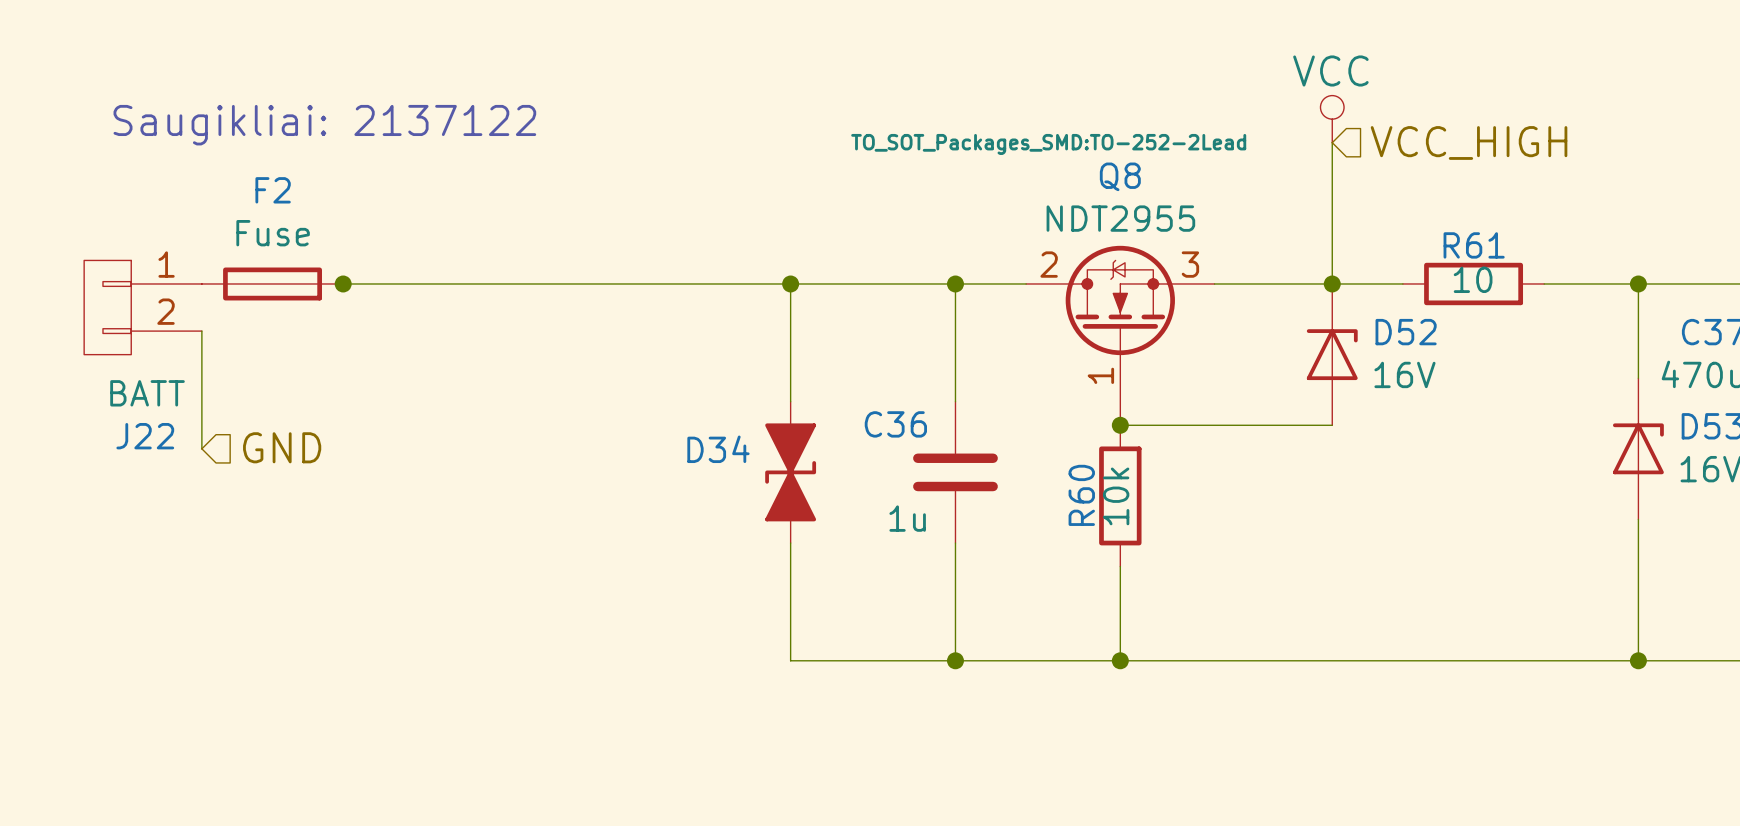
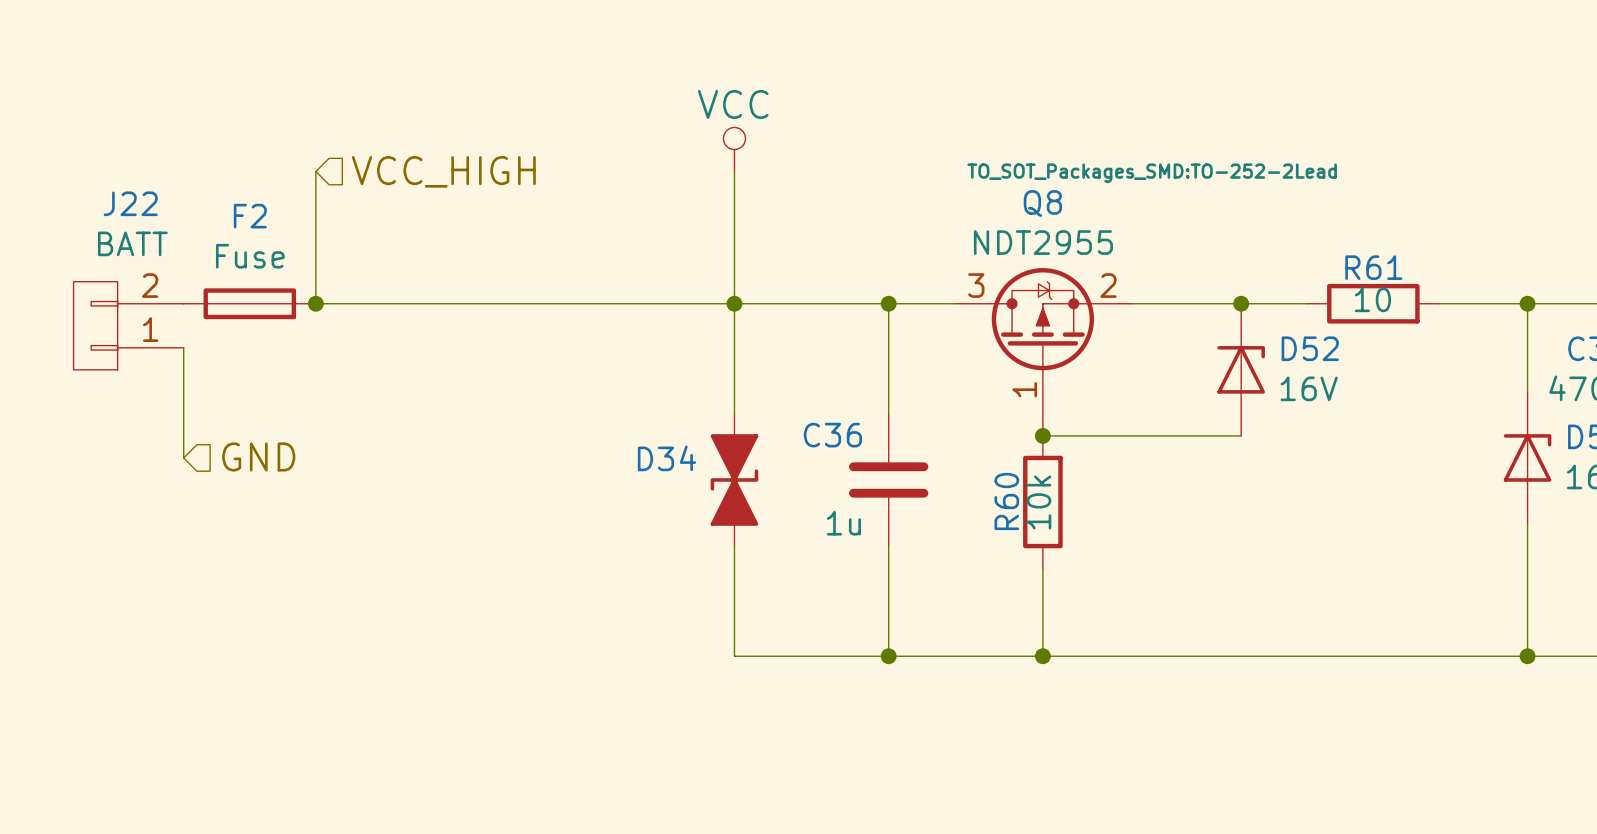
power symbol: none -> VCC (734, 149)
power symbol: VCC (1332, 119) -> none
text: Saugikliai: 2137122 (324, 125) -> none
wire: none -> (315, 171) (315, 303)
hierarchical label: none -> VCC_HIGH (443, 171)
wire: none -> (734, 171) (734, 303)
wire: (1332, 142) (1332, 283) -> none
hierarchical label: VCC_HIGH (1469, 142) -> none
Q8 text position: TO_SOT_Packages_SMD:TO-252-2Lead (1048, 144) -> TO_SOT_Packages_SMD:TO-252-2Lead (1152, 173)
Q8 symbol: [1026, 245, 1215, 426] -> [954, 268, 1132, 436]
J22 flip: as is (107, 307) -> up-down (95, 325)

